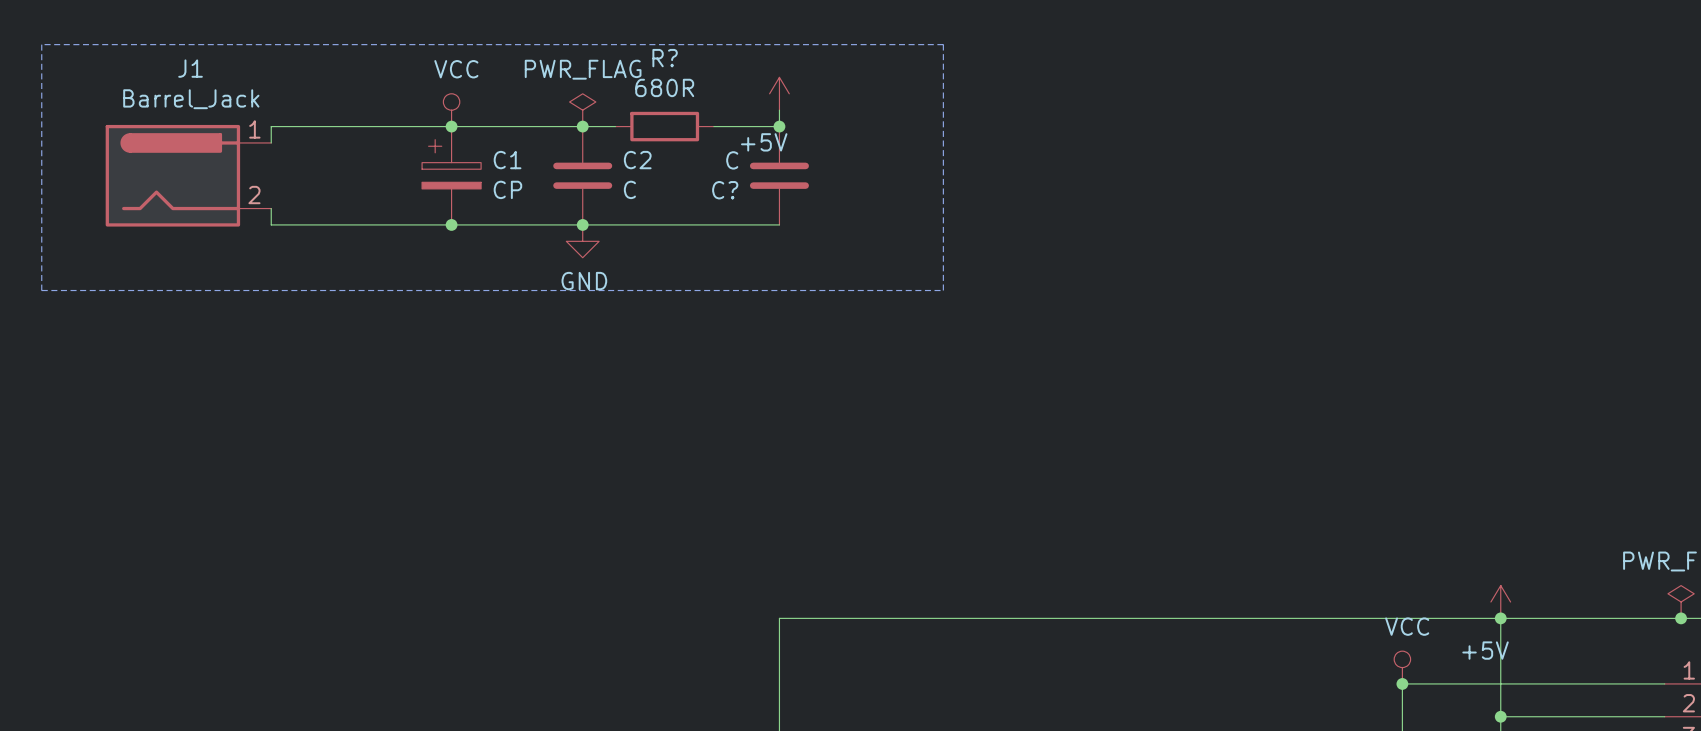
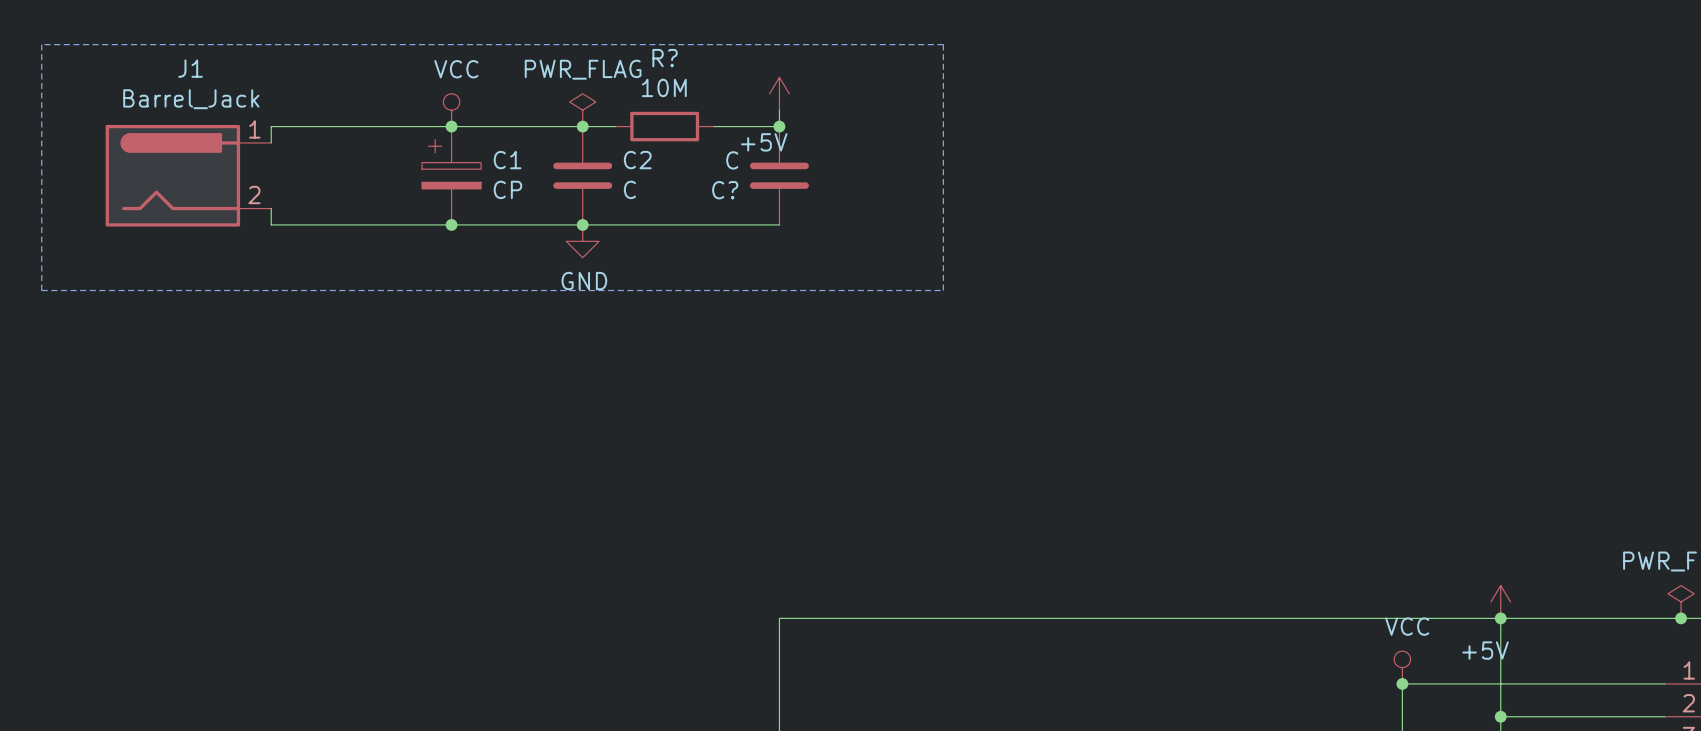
R? value: 680R (664, 87) -> 10M (664, 87)

